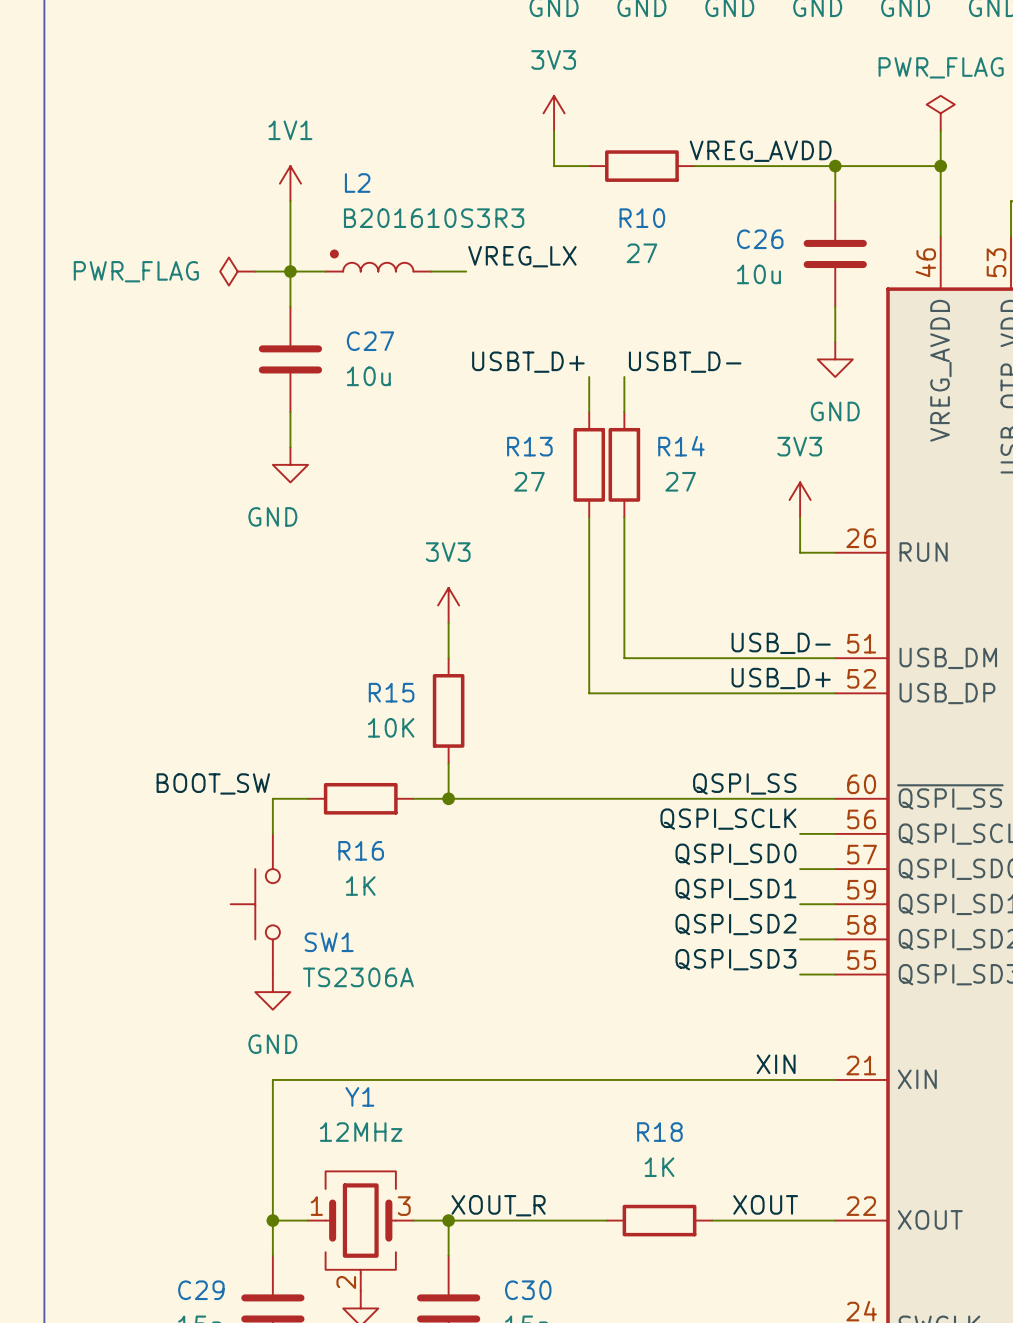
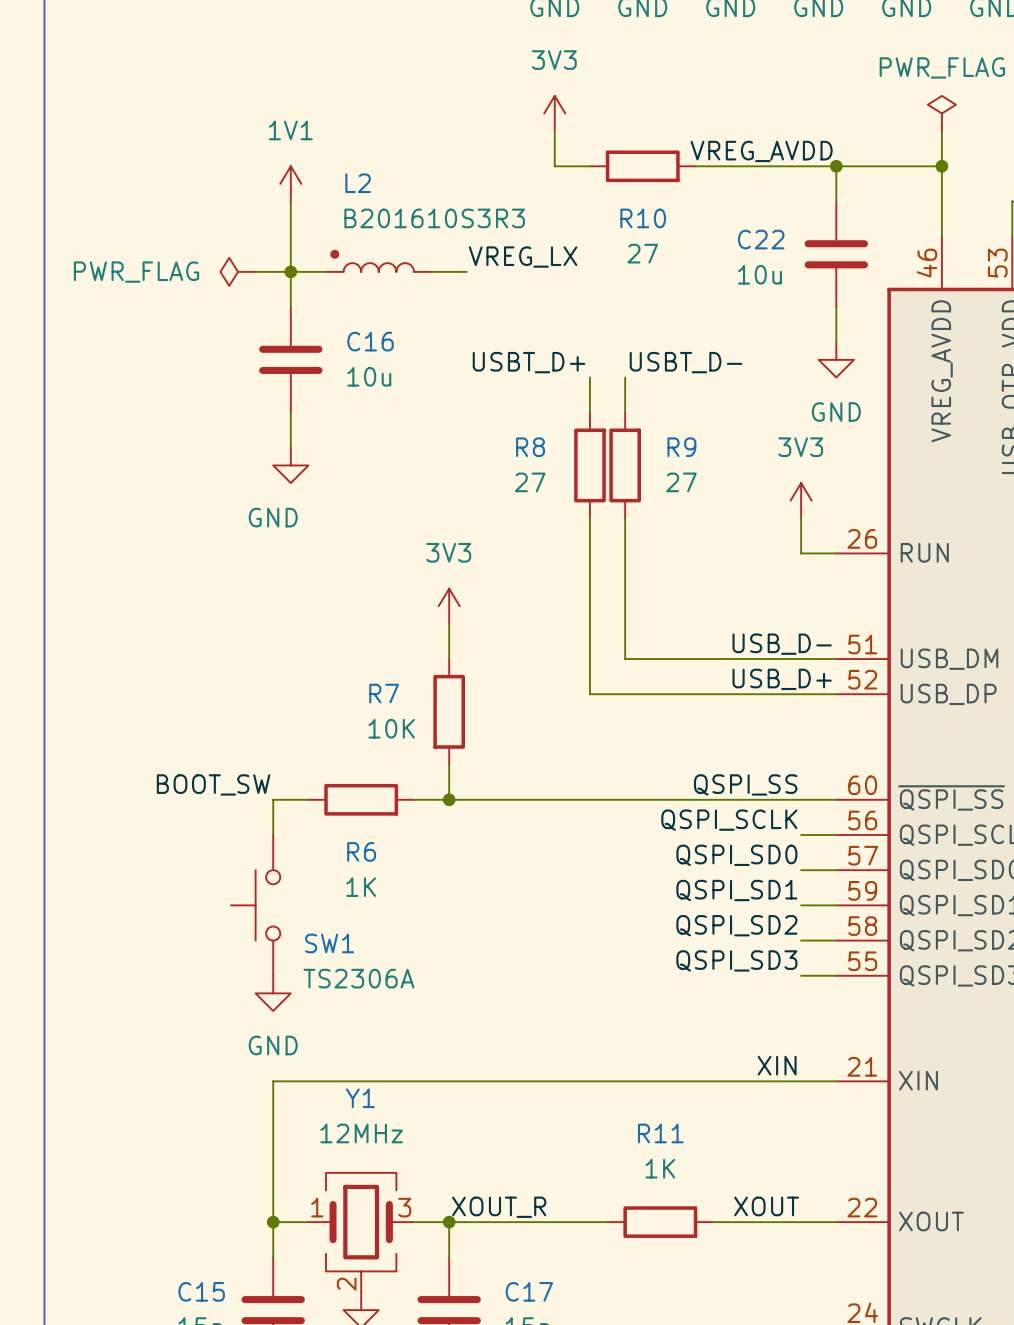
C26 name: C26 (760, 239) -> C22 (761, 239)
C27 name: C27 (370, 341) -> C16 (370, 341)
R13 name: R13 (529, 446) -> R8 (530, 447)
R14 name: R14 (681, 446) -> R9 (681, 447)
R15 name: R15 (391, 692) -> R7 (384, 693)
R16 name: R16 (361, 850) -> R6 (361, 851)
R18 name: R18 (659, 1132) -> R11 (660, 1133)
C29 name: C29 (201, 1290) -> C15 (201, 1291)
C30 name: C30 (528, 1290) -> C17 (529, 1291)

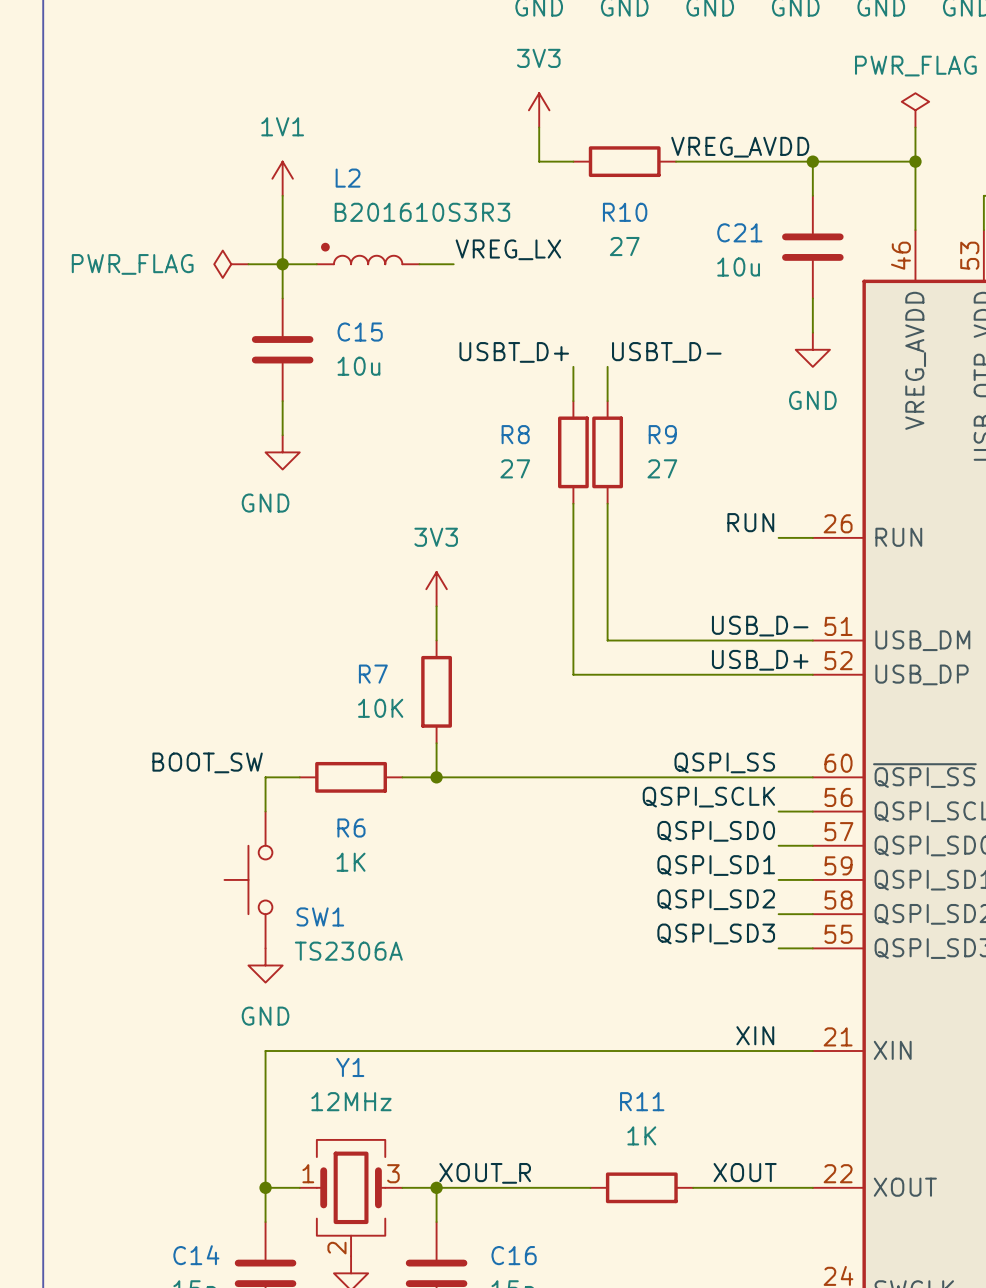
C22 name: C22 (761, 239) -> C21 (739, 232)
C16 name: C16 (370, 341) -> C15 (360, 332)
power symbol: 3V3 (801, 500) -> none
wire: (801, 518) (801, 553) -> none
label: none -> RUN (750, 522)
C15 name: C15 (201, 1291) -> C14 (196, 1255)
C17 name: C17 (529, 1291) -> C16 (514, 1255)

